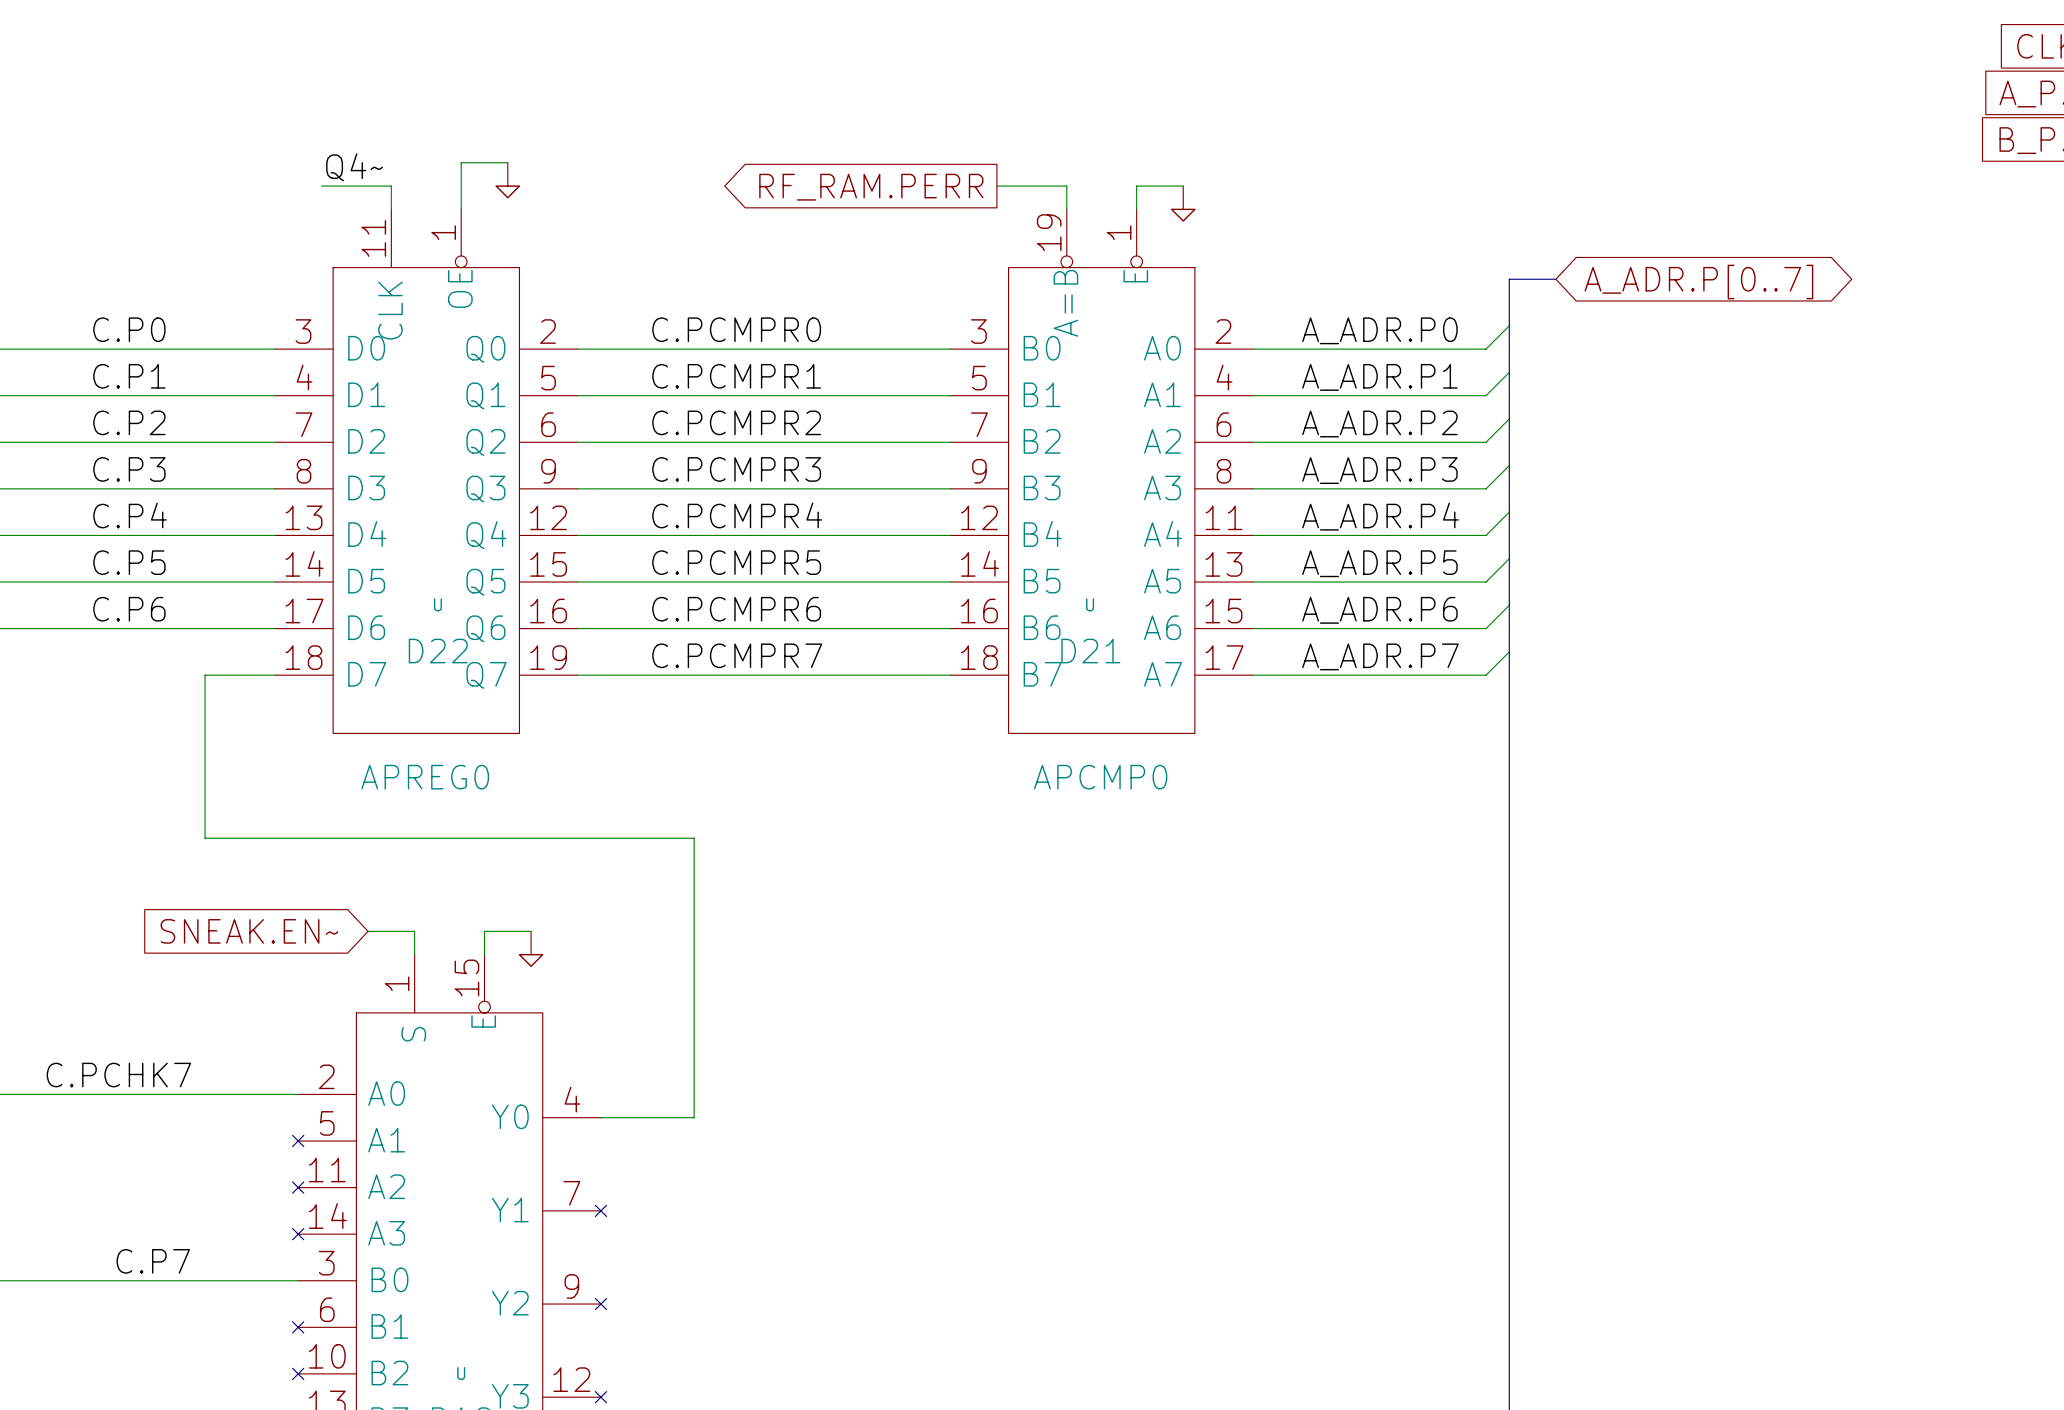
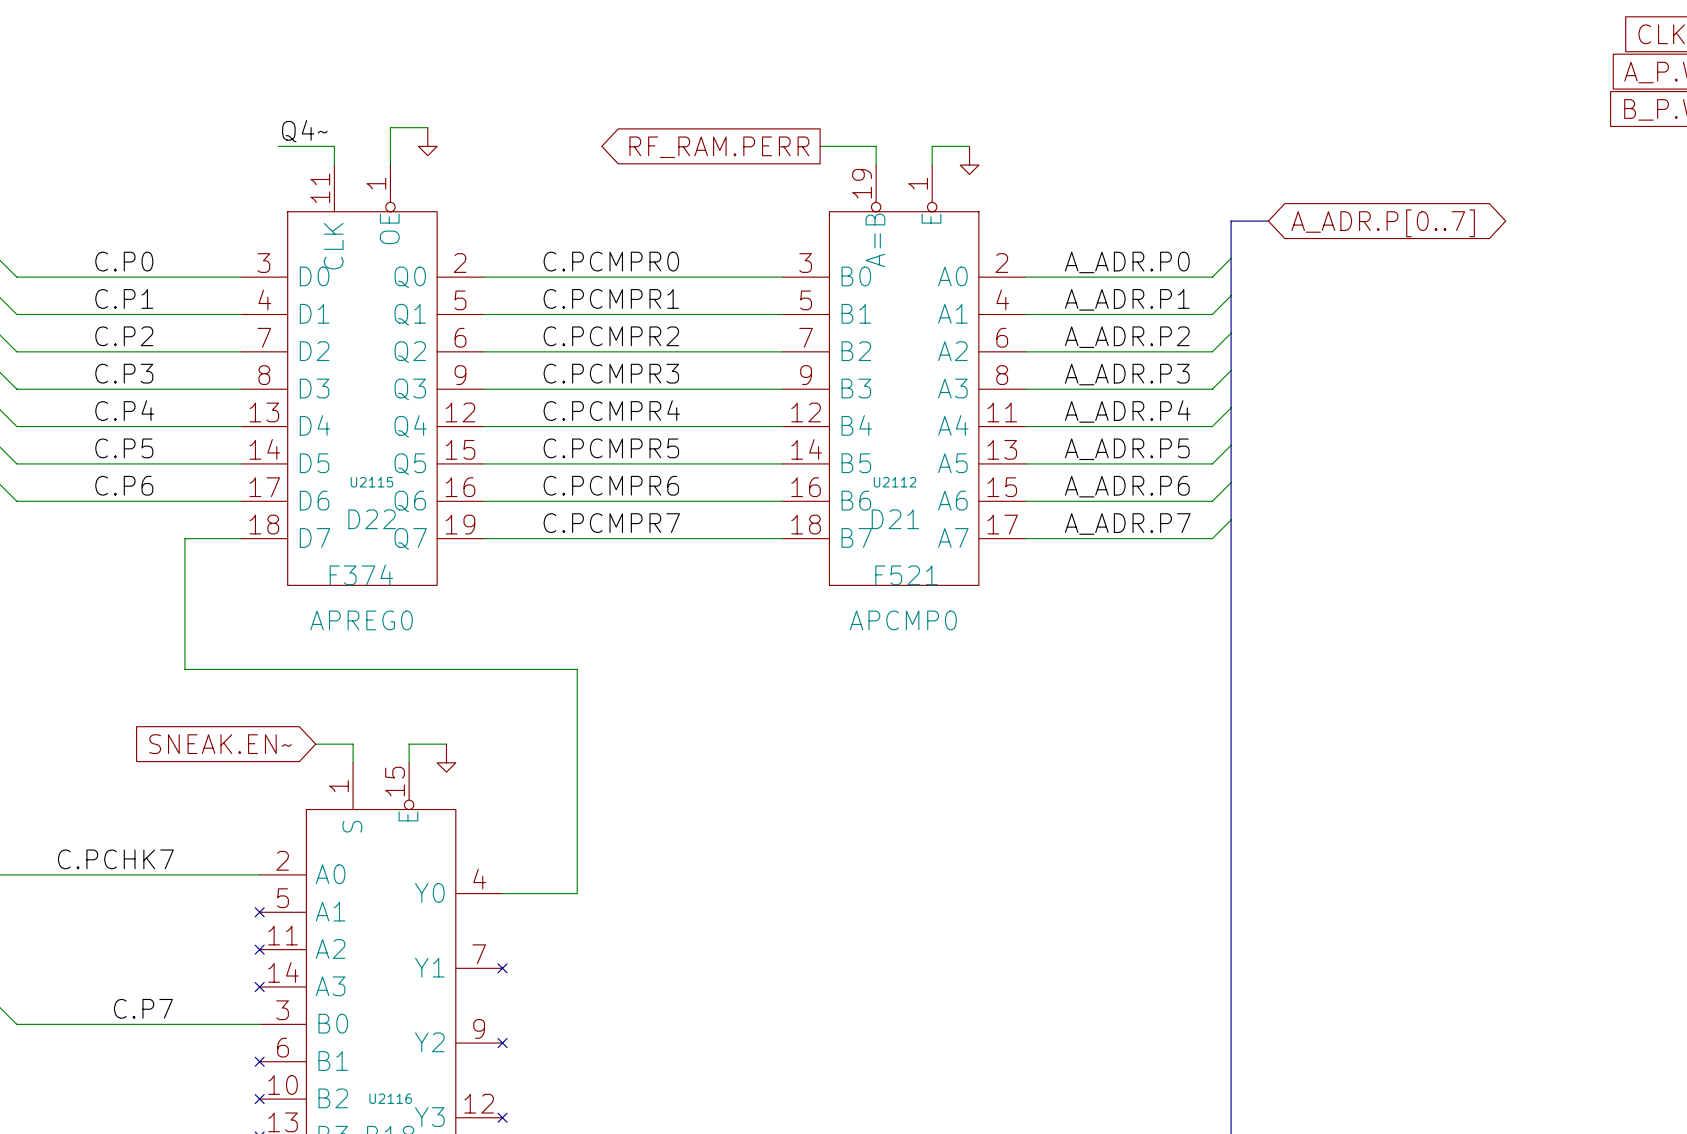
U name: U (437, 604) -> U2115 (371, 482)
U name: U (1090, 604) -> U2112 (895, 482)
U value: none -> F374 (361, 574)
U value: none -> F521 (906, 575)
U name: U (461, 1373) -> U2116 (390, 1098)

